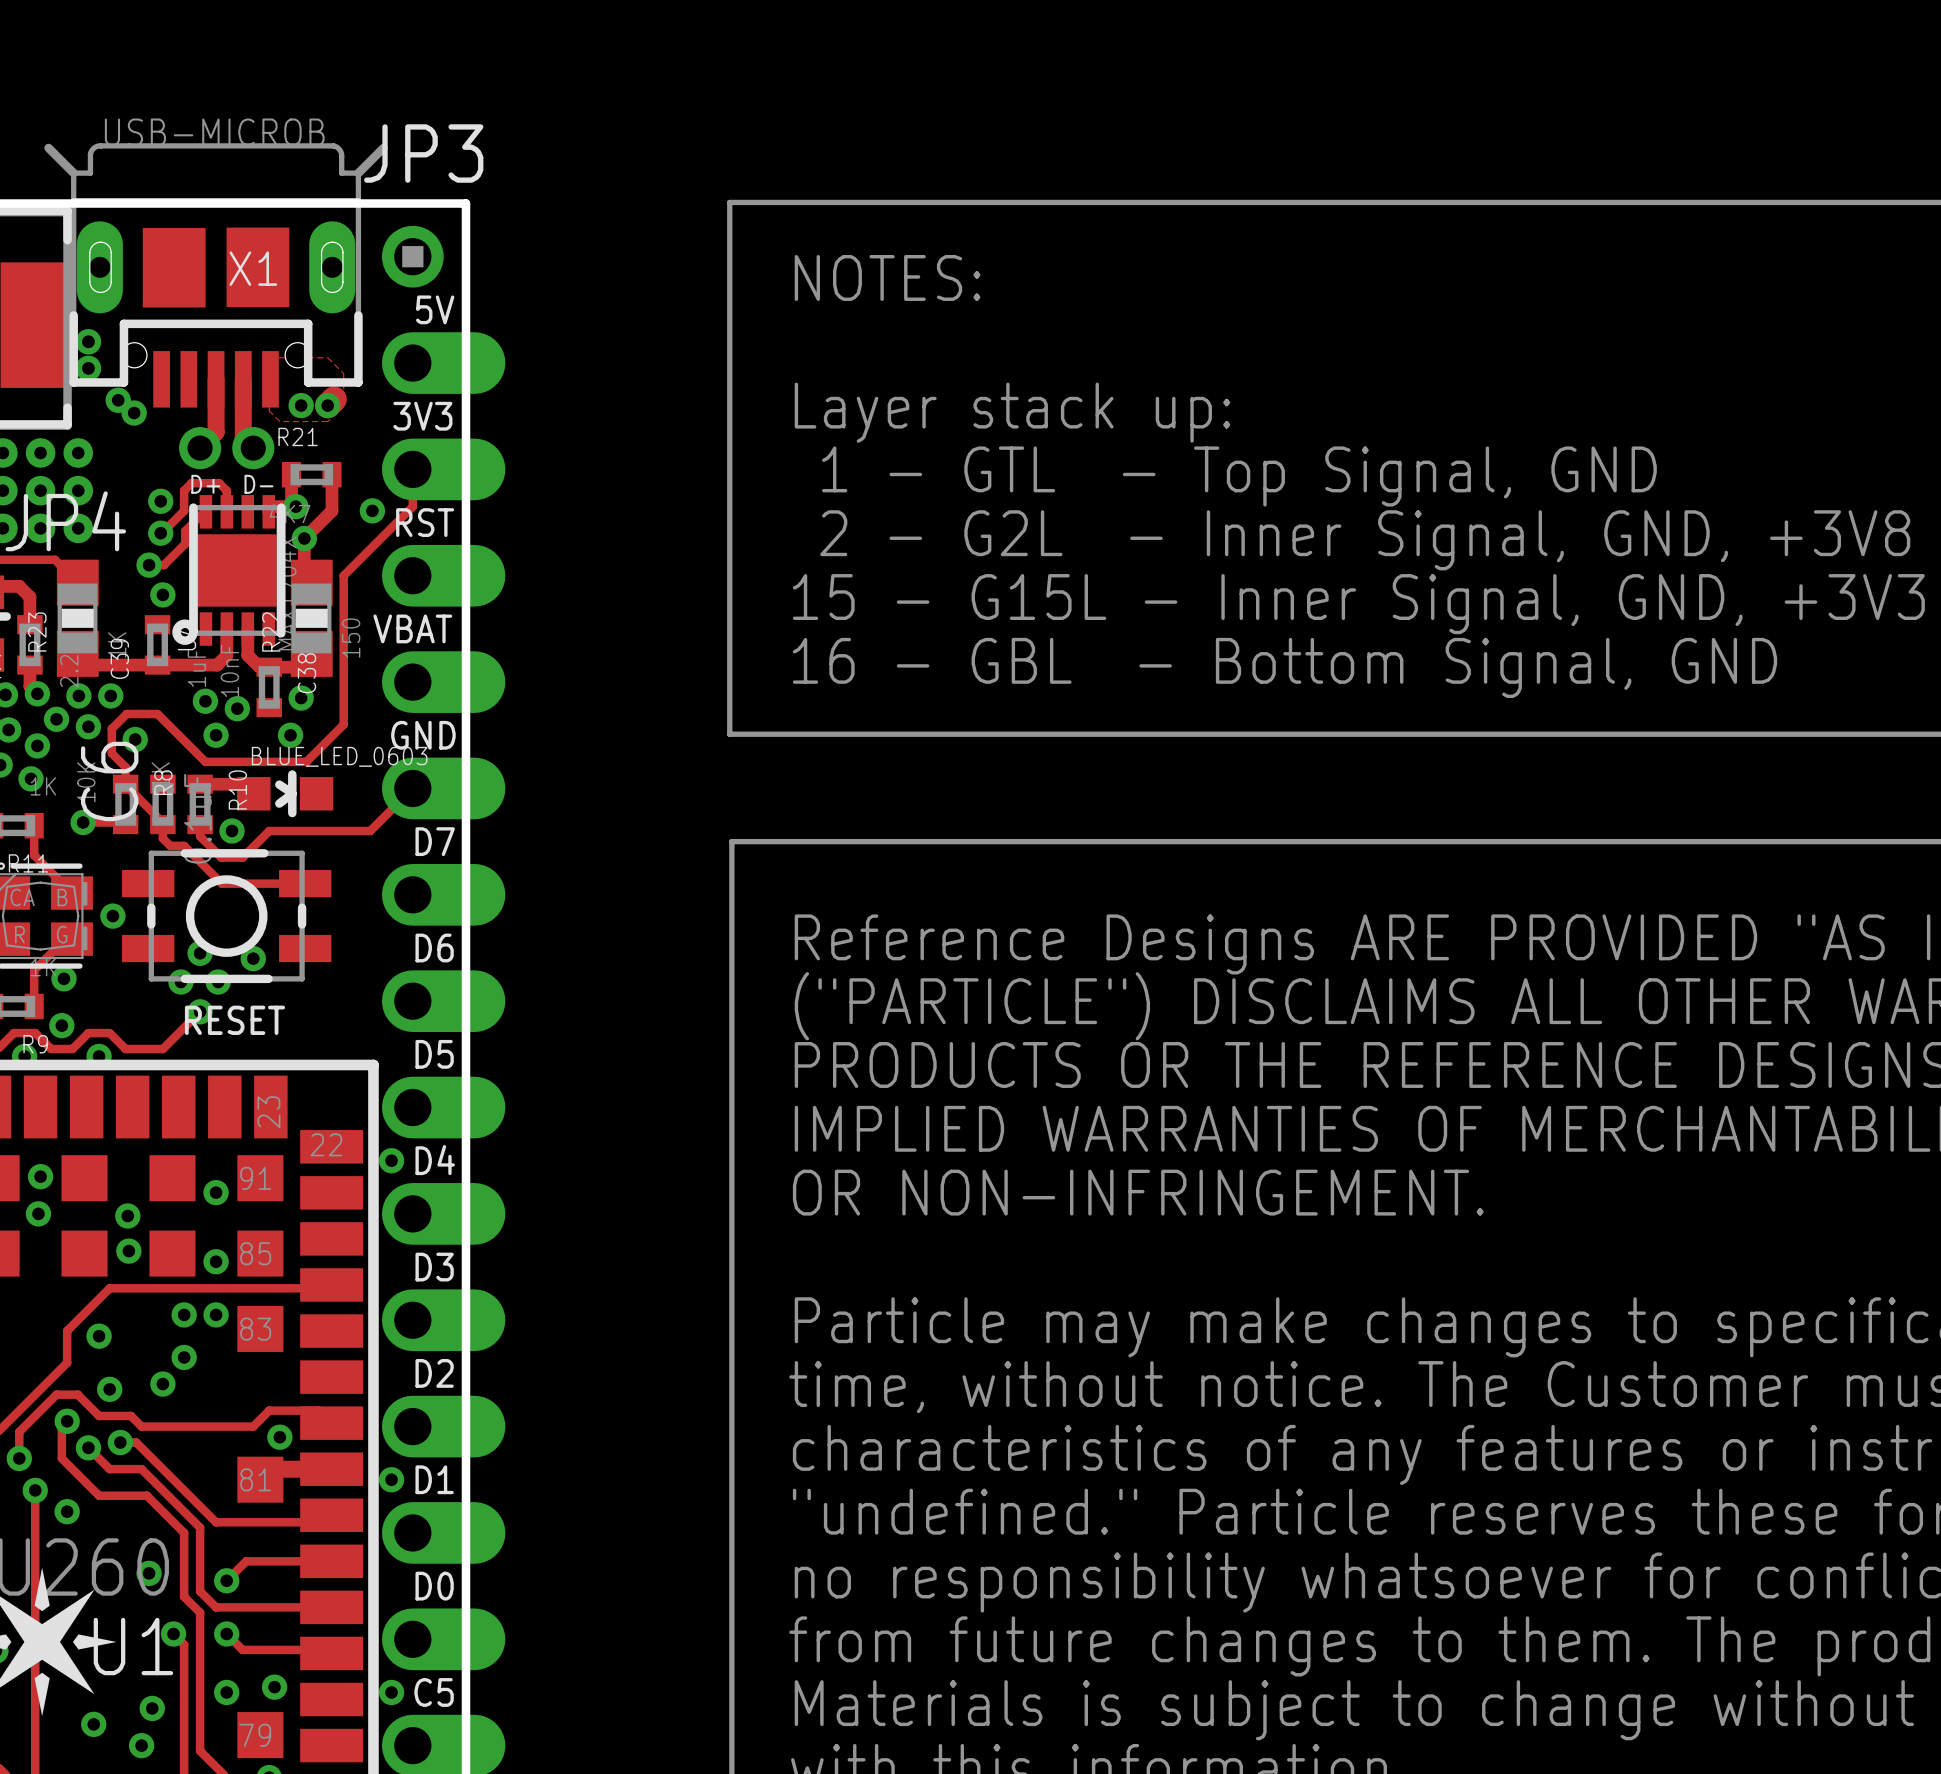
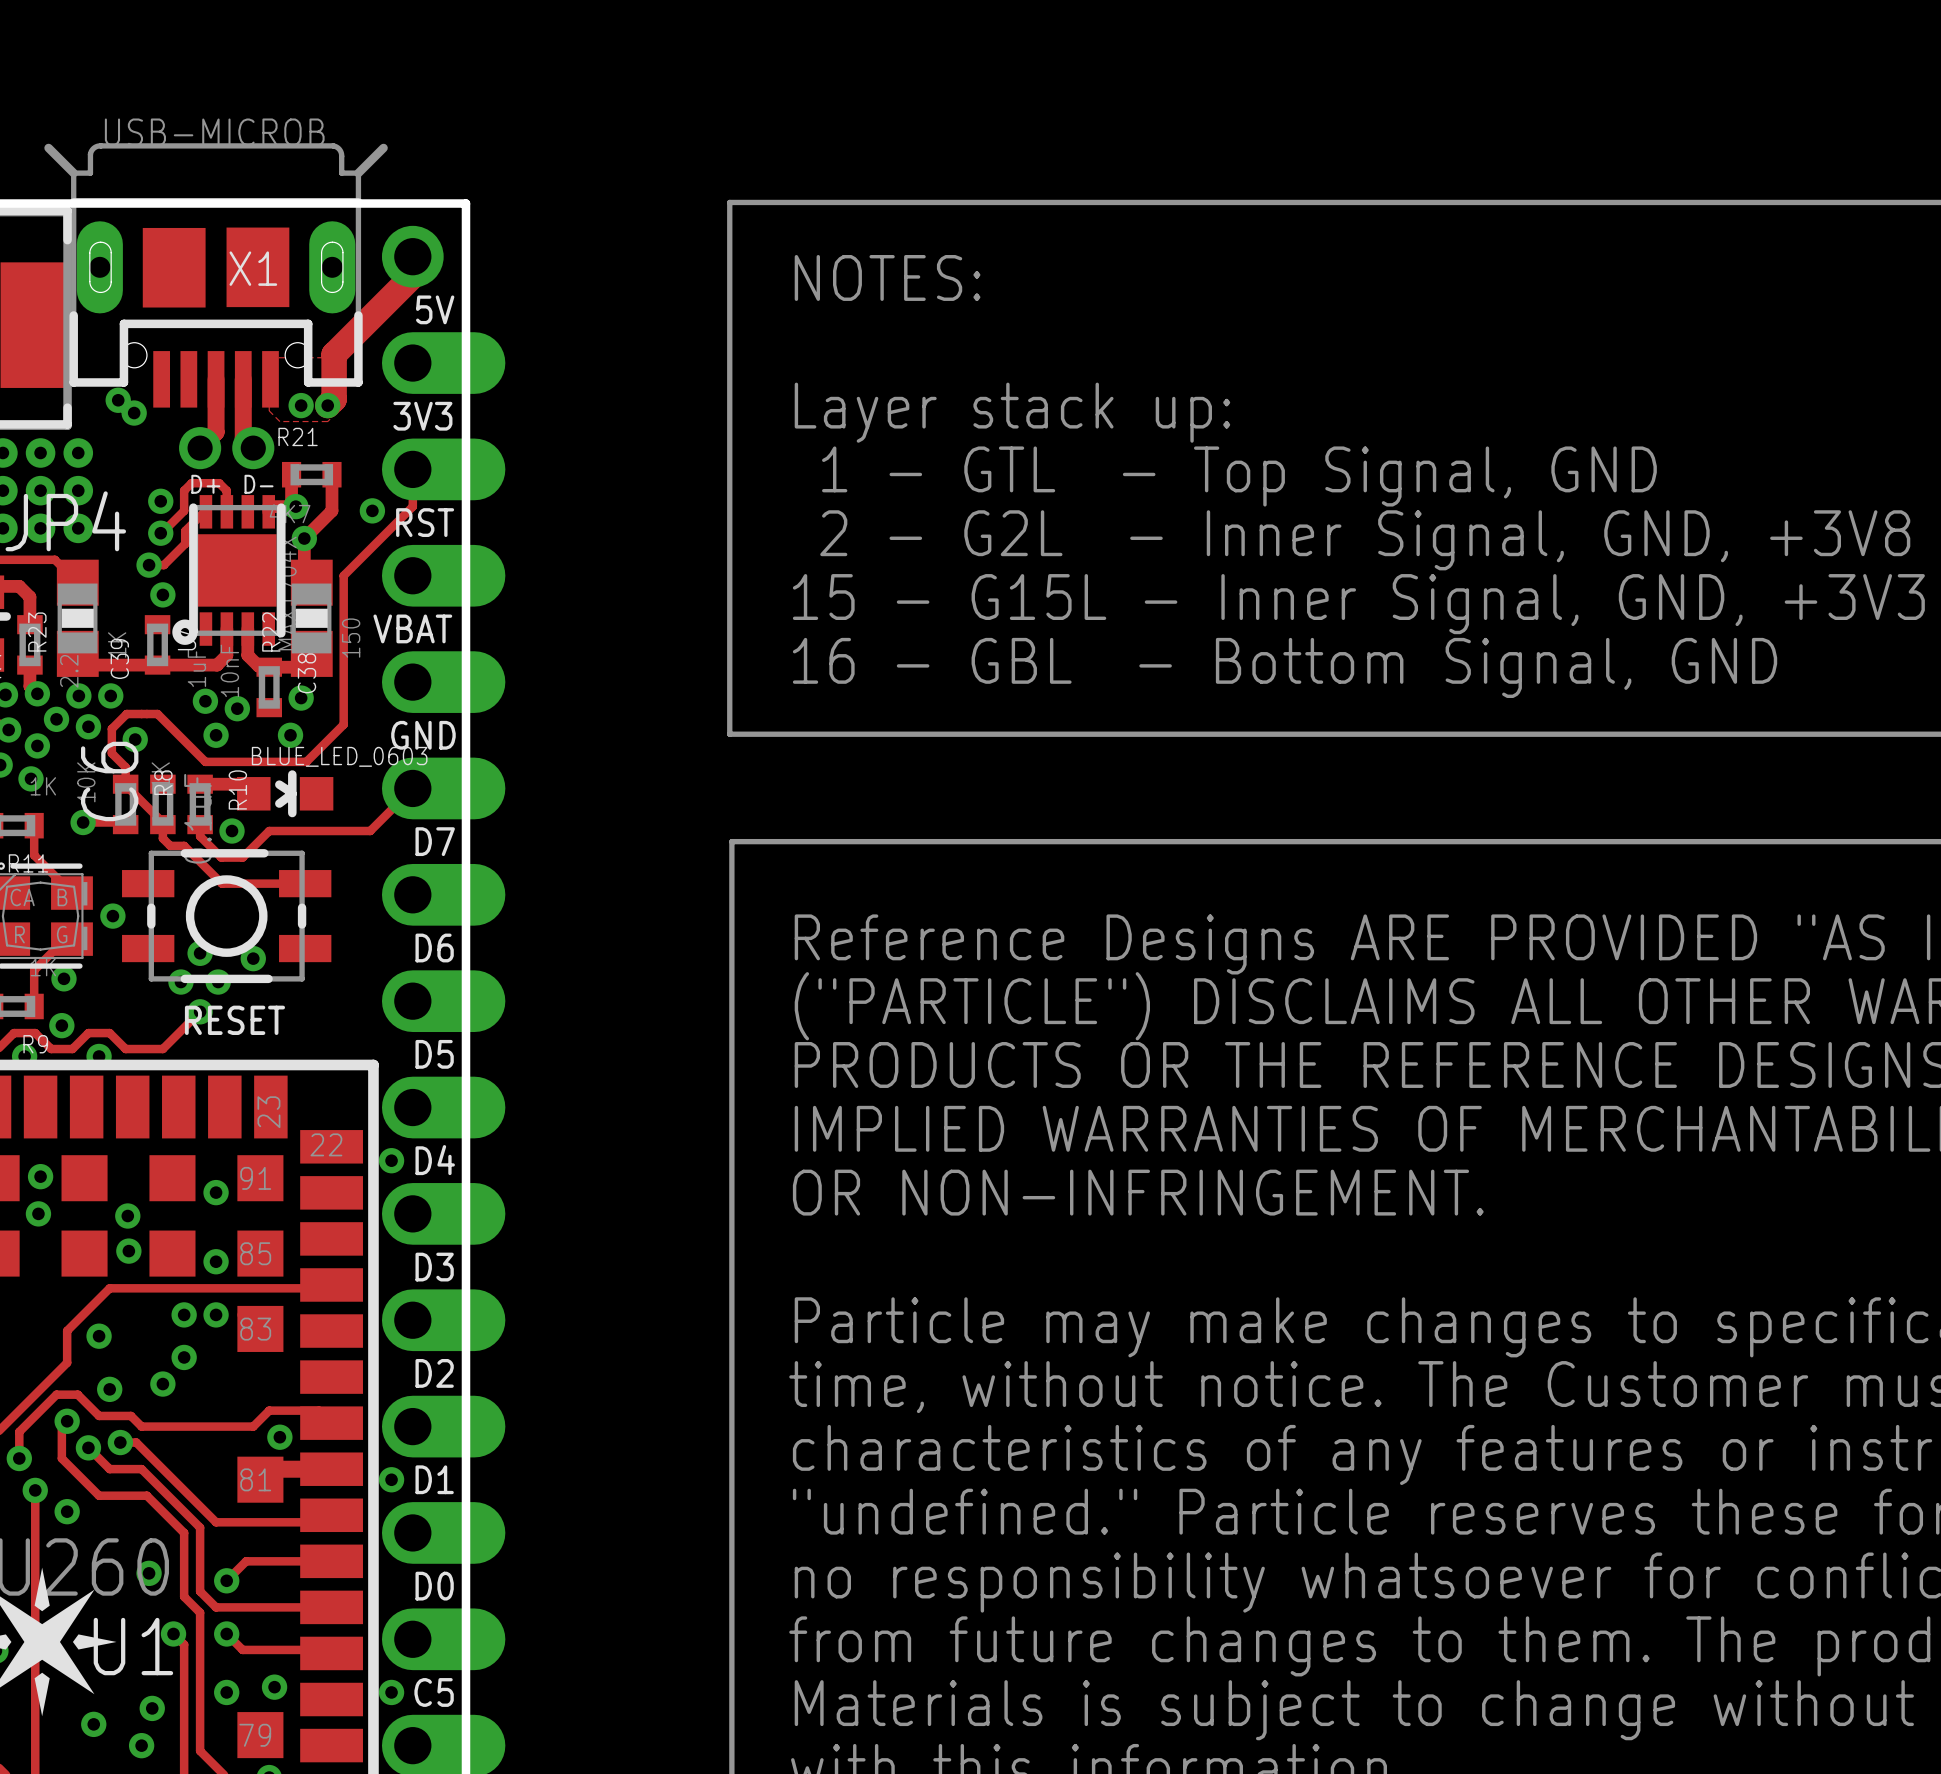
track: none -> (412, 256) (412, 275) (334, 354) (334, 399)
JP3 side: top (412, 256) -> bottom (412, 256)
via: (88, 341) -> none
via: (88, 368) -> none

